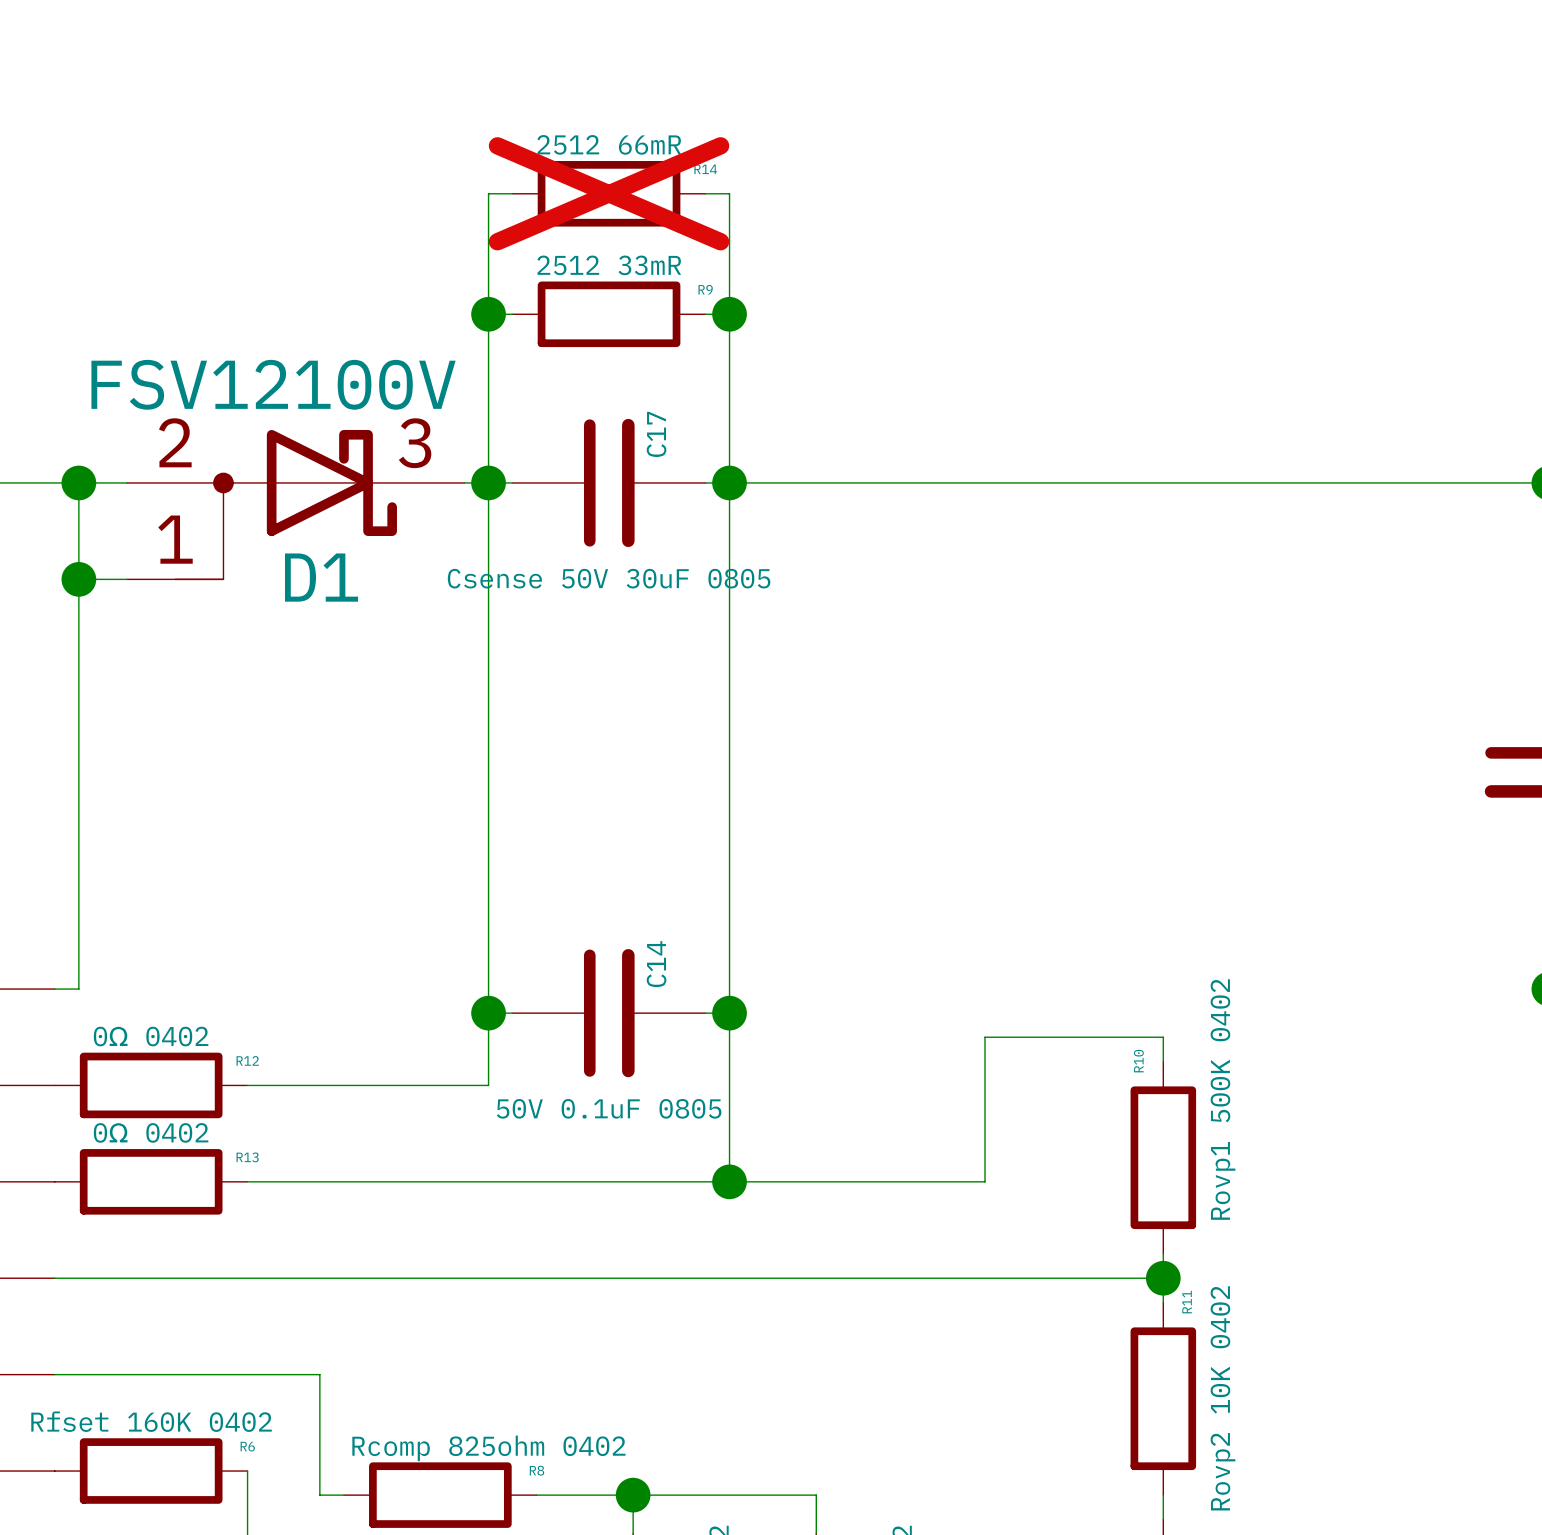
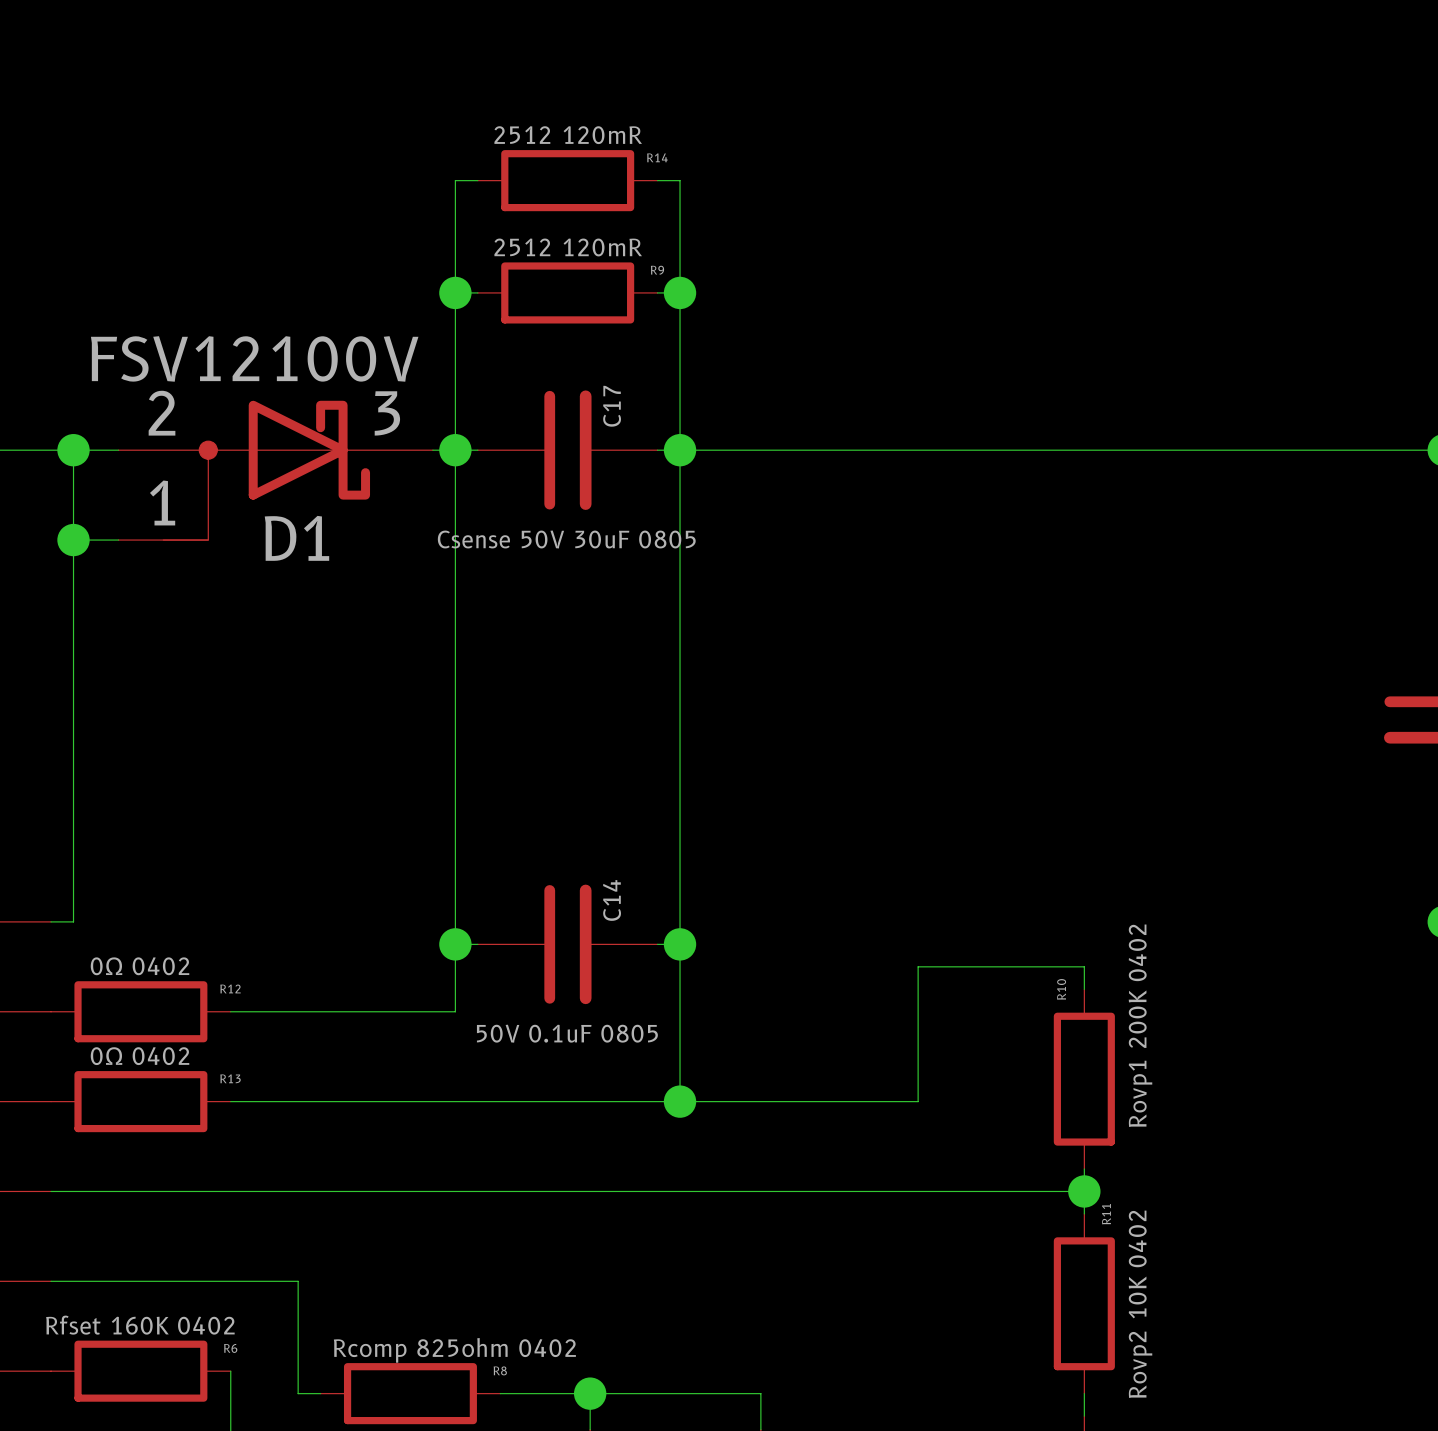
R14 value: 2512 66mR (609, 144) -> 2512 120mR (568, 135)
R14 do-not-place cross: (609, 193) -> none
R9 value: 2512 33mR (609, 265) -> 2512 120mR (568, 247)
R10 value: Rovp1 500K 0402 (1223, 1099) -> Rovp1 200K 0402 (1140, 1025)

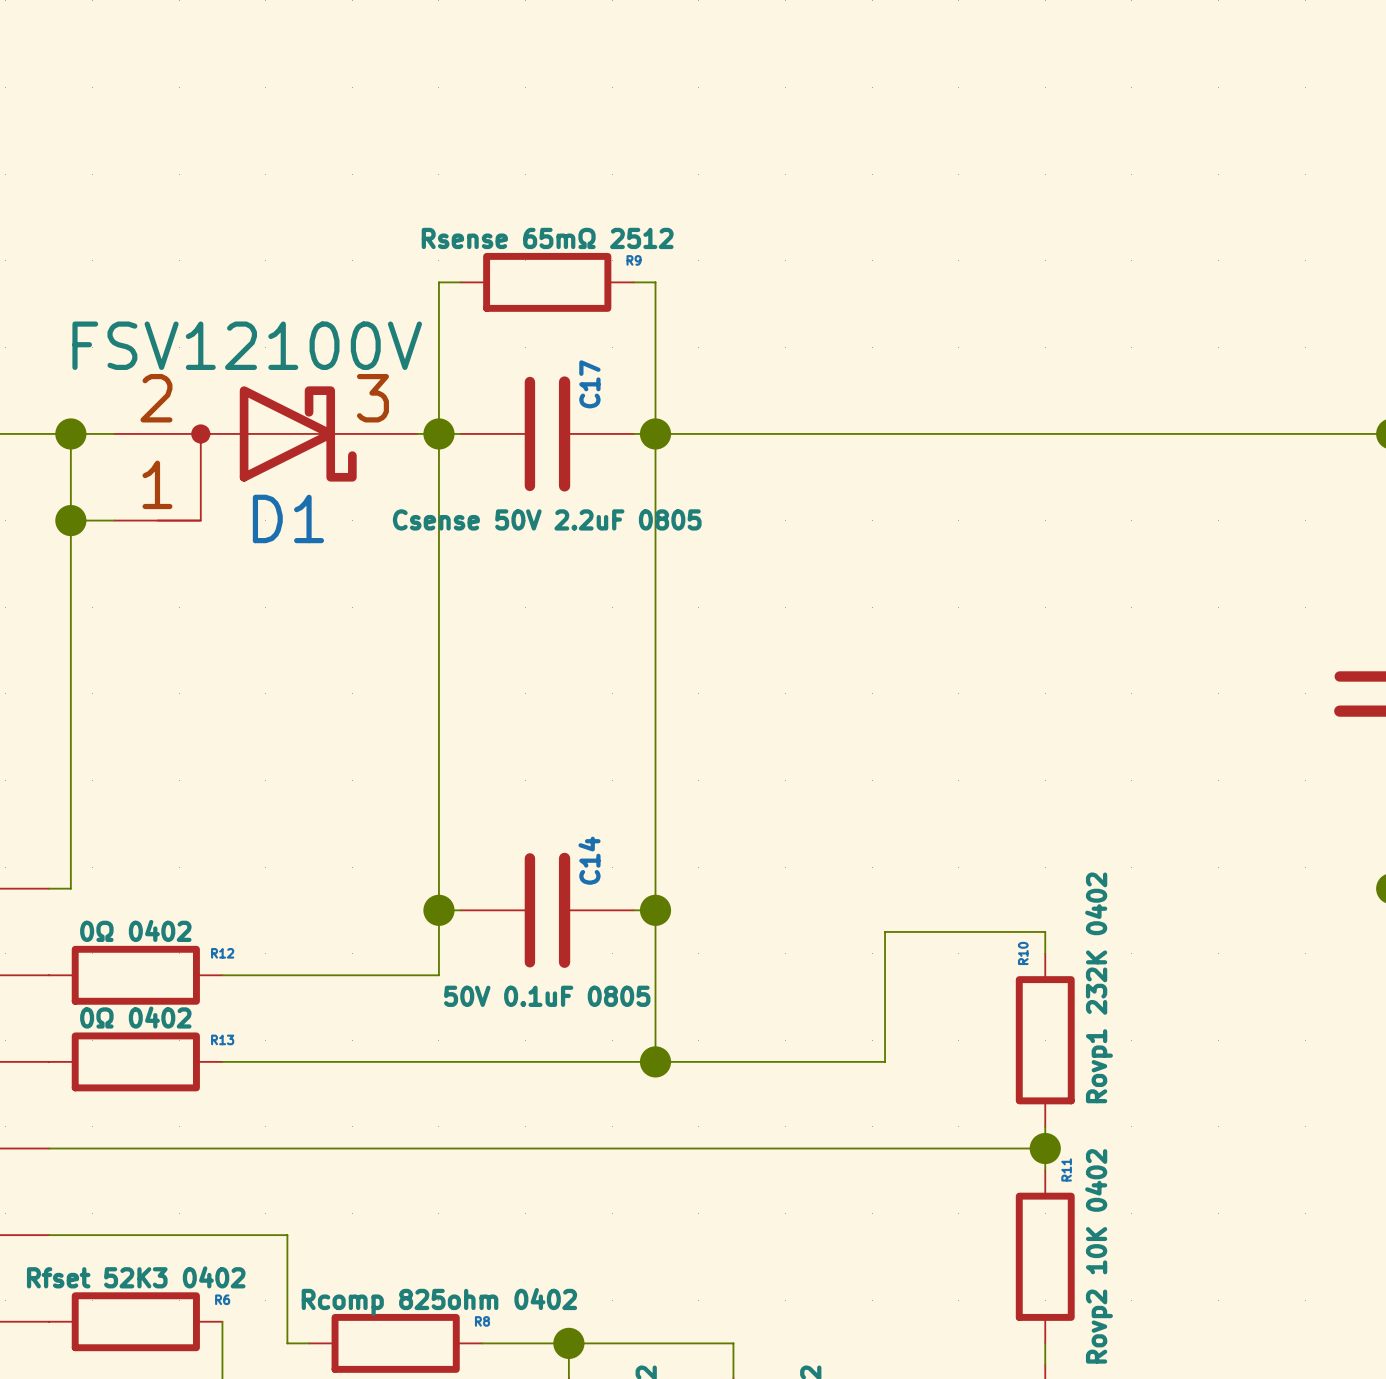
wire: (477, 180) (455, 180) (455, 292) -> none
R14: 2512 120mR (567, 180) -> none
wire: (657, 180) (680, 180) (680, 292) -> none
R9 value: 2512 120mR (568, 247) -> Rsense 65mΩ 2512 (547, 238)
junction: (455, 292) -> none
junction: (680, 292) -> none
C17 value: Csense 50V 30uF 0805 (566, 539) -> Csense 50V 2.2uF 0805 (547, 519)
R10 value: Rovp1 200K 0402 (1140, 1025) -> Rovp1 232K 0402 (1099, 987)
R6 value: Rfset 160K 0402 (140, 1325) -> Rfset 52K3 0402 (136, 1277)

